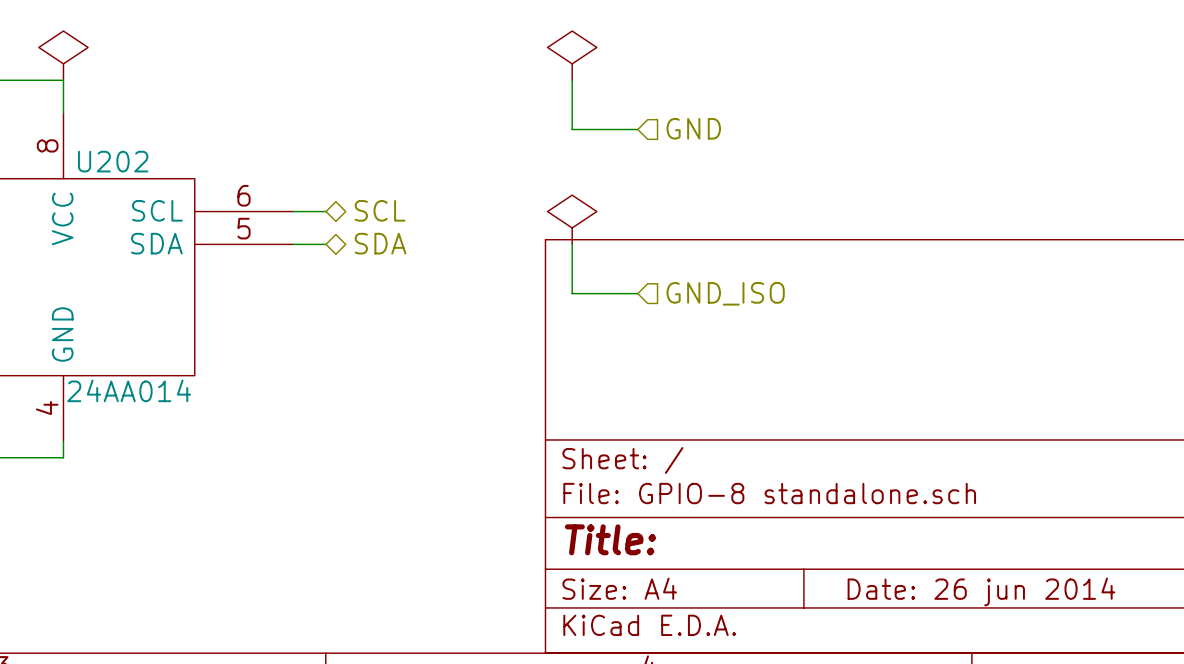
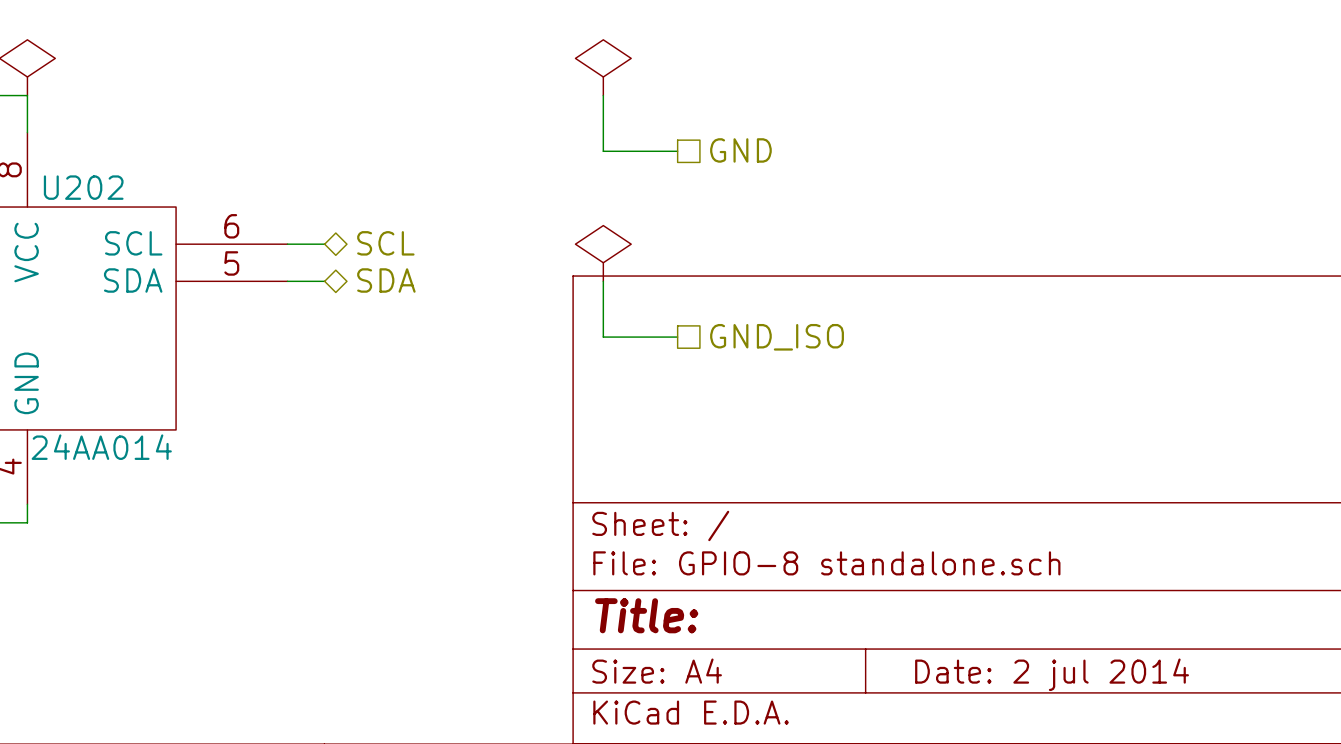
hierarchical label shape: input (693, 128) -> passive (740, 150)
hierarchical label shape: input (725, 293) -> passive (777, 337)
title block: Date: 26 jun 2014 (981, 591) -> Date: 2 jul 2014 (1052, 674)

